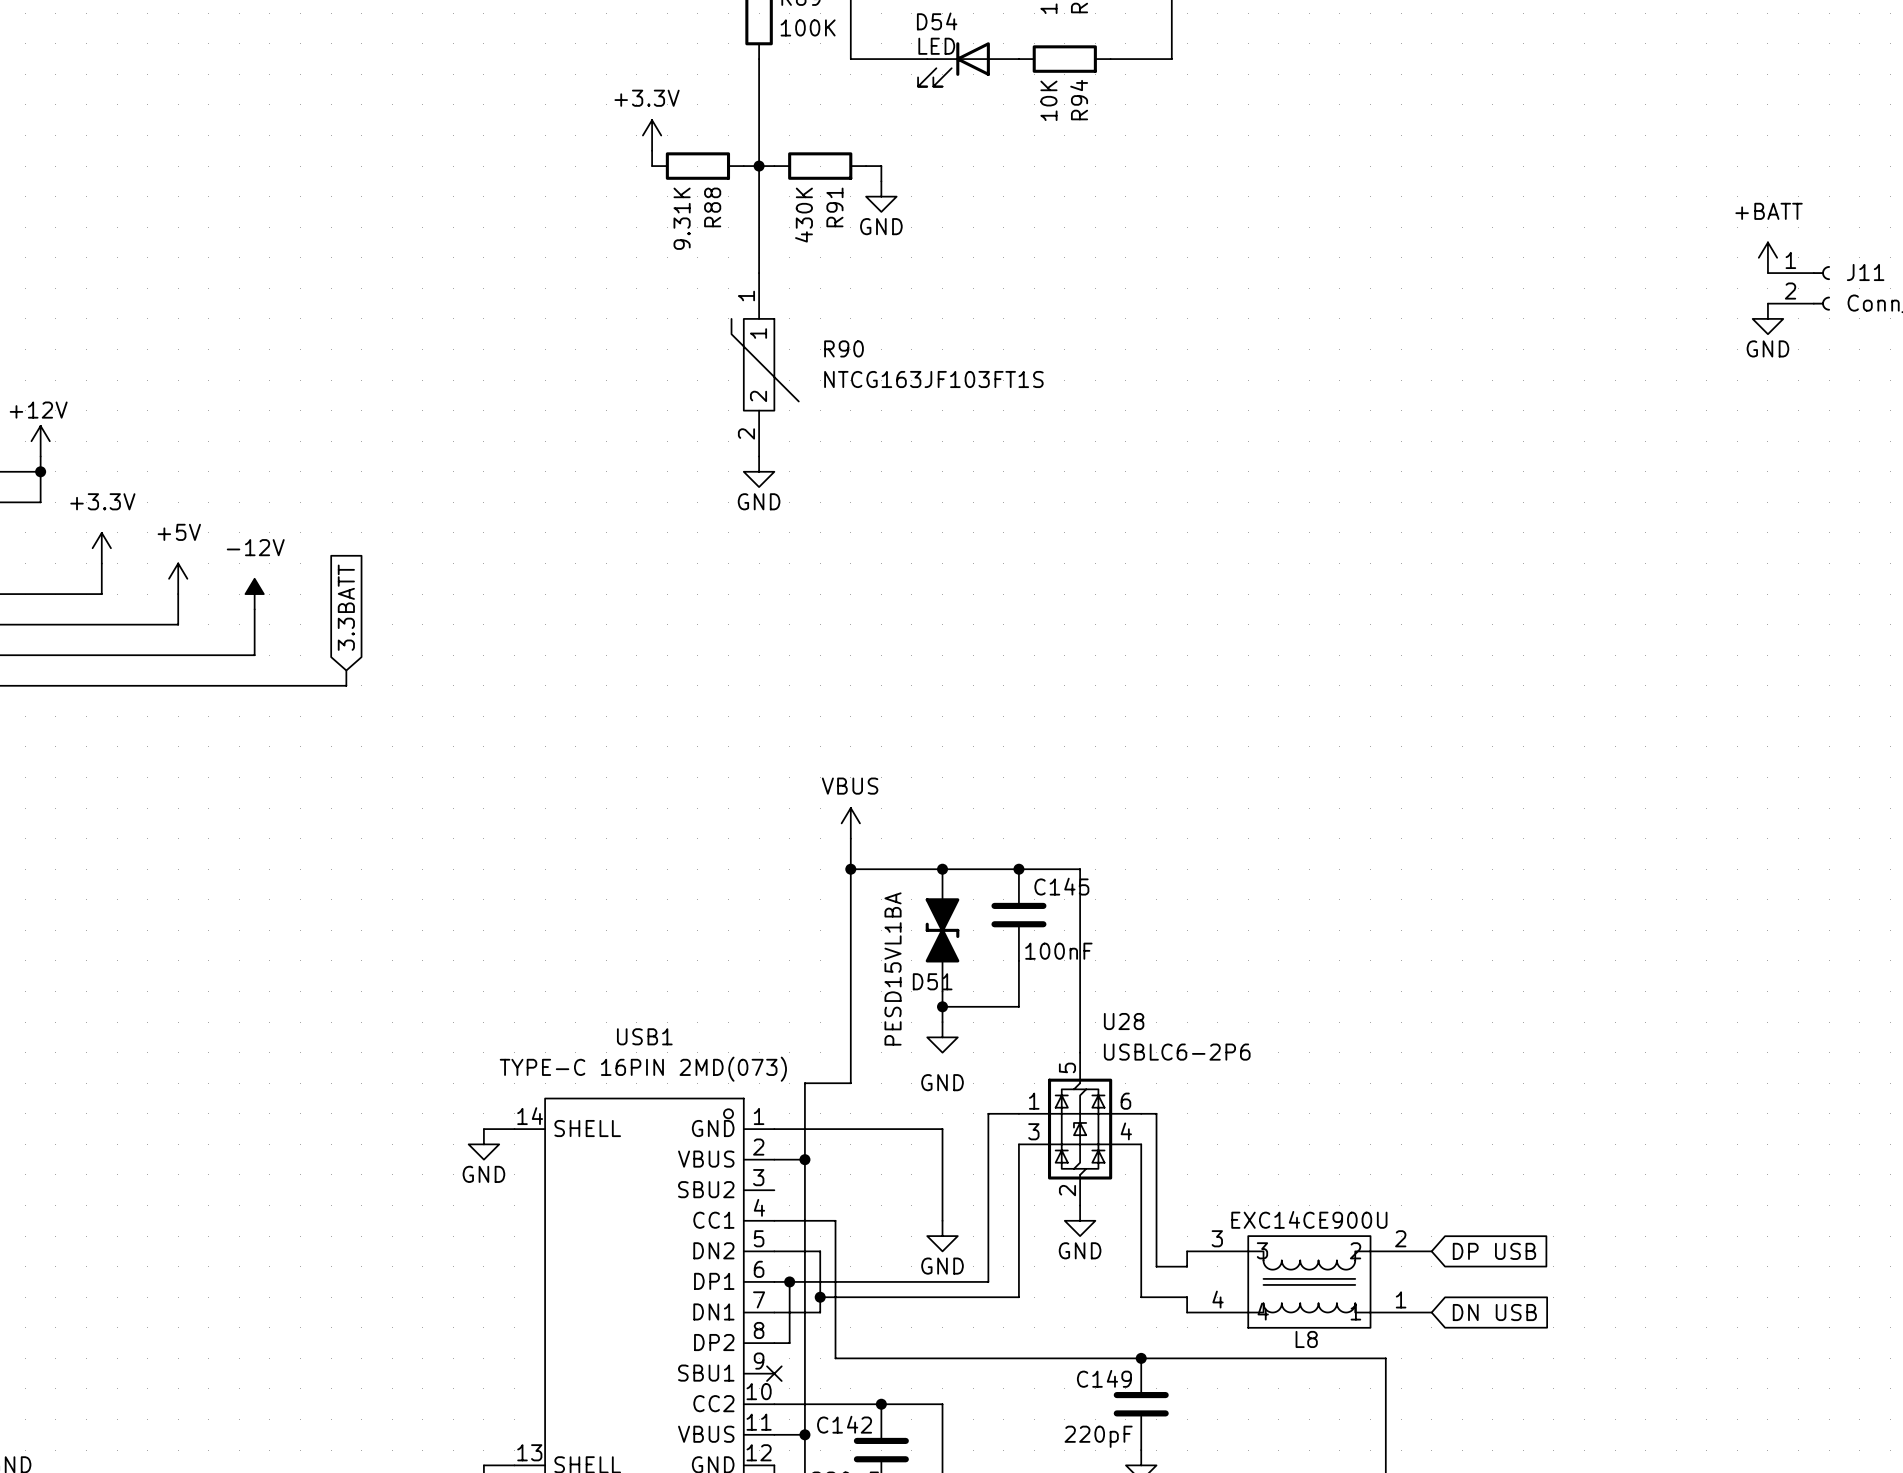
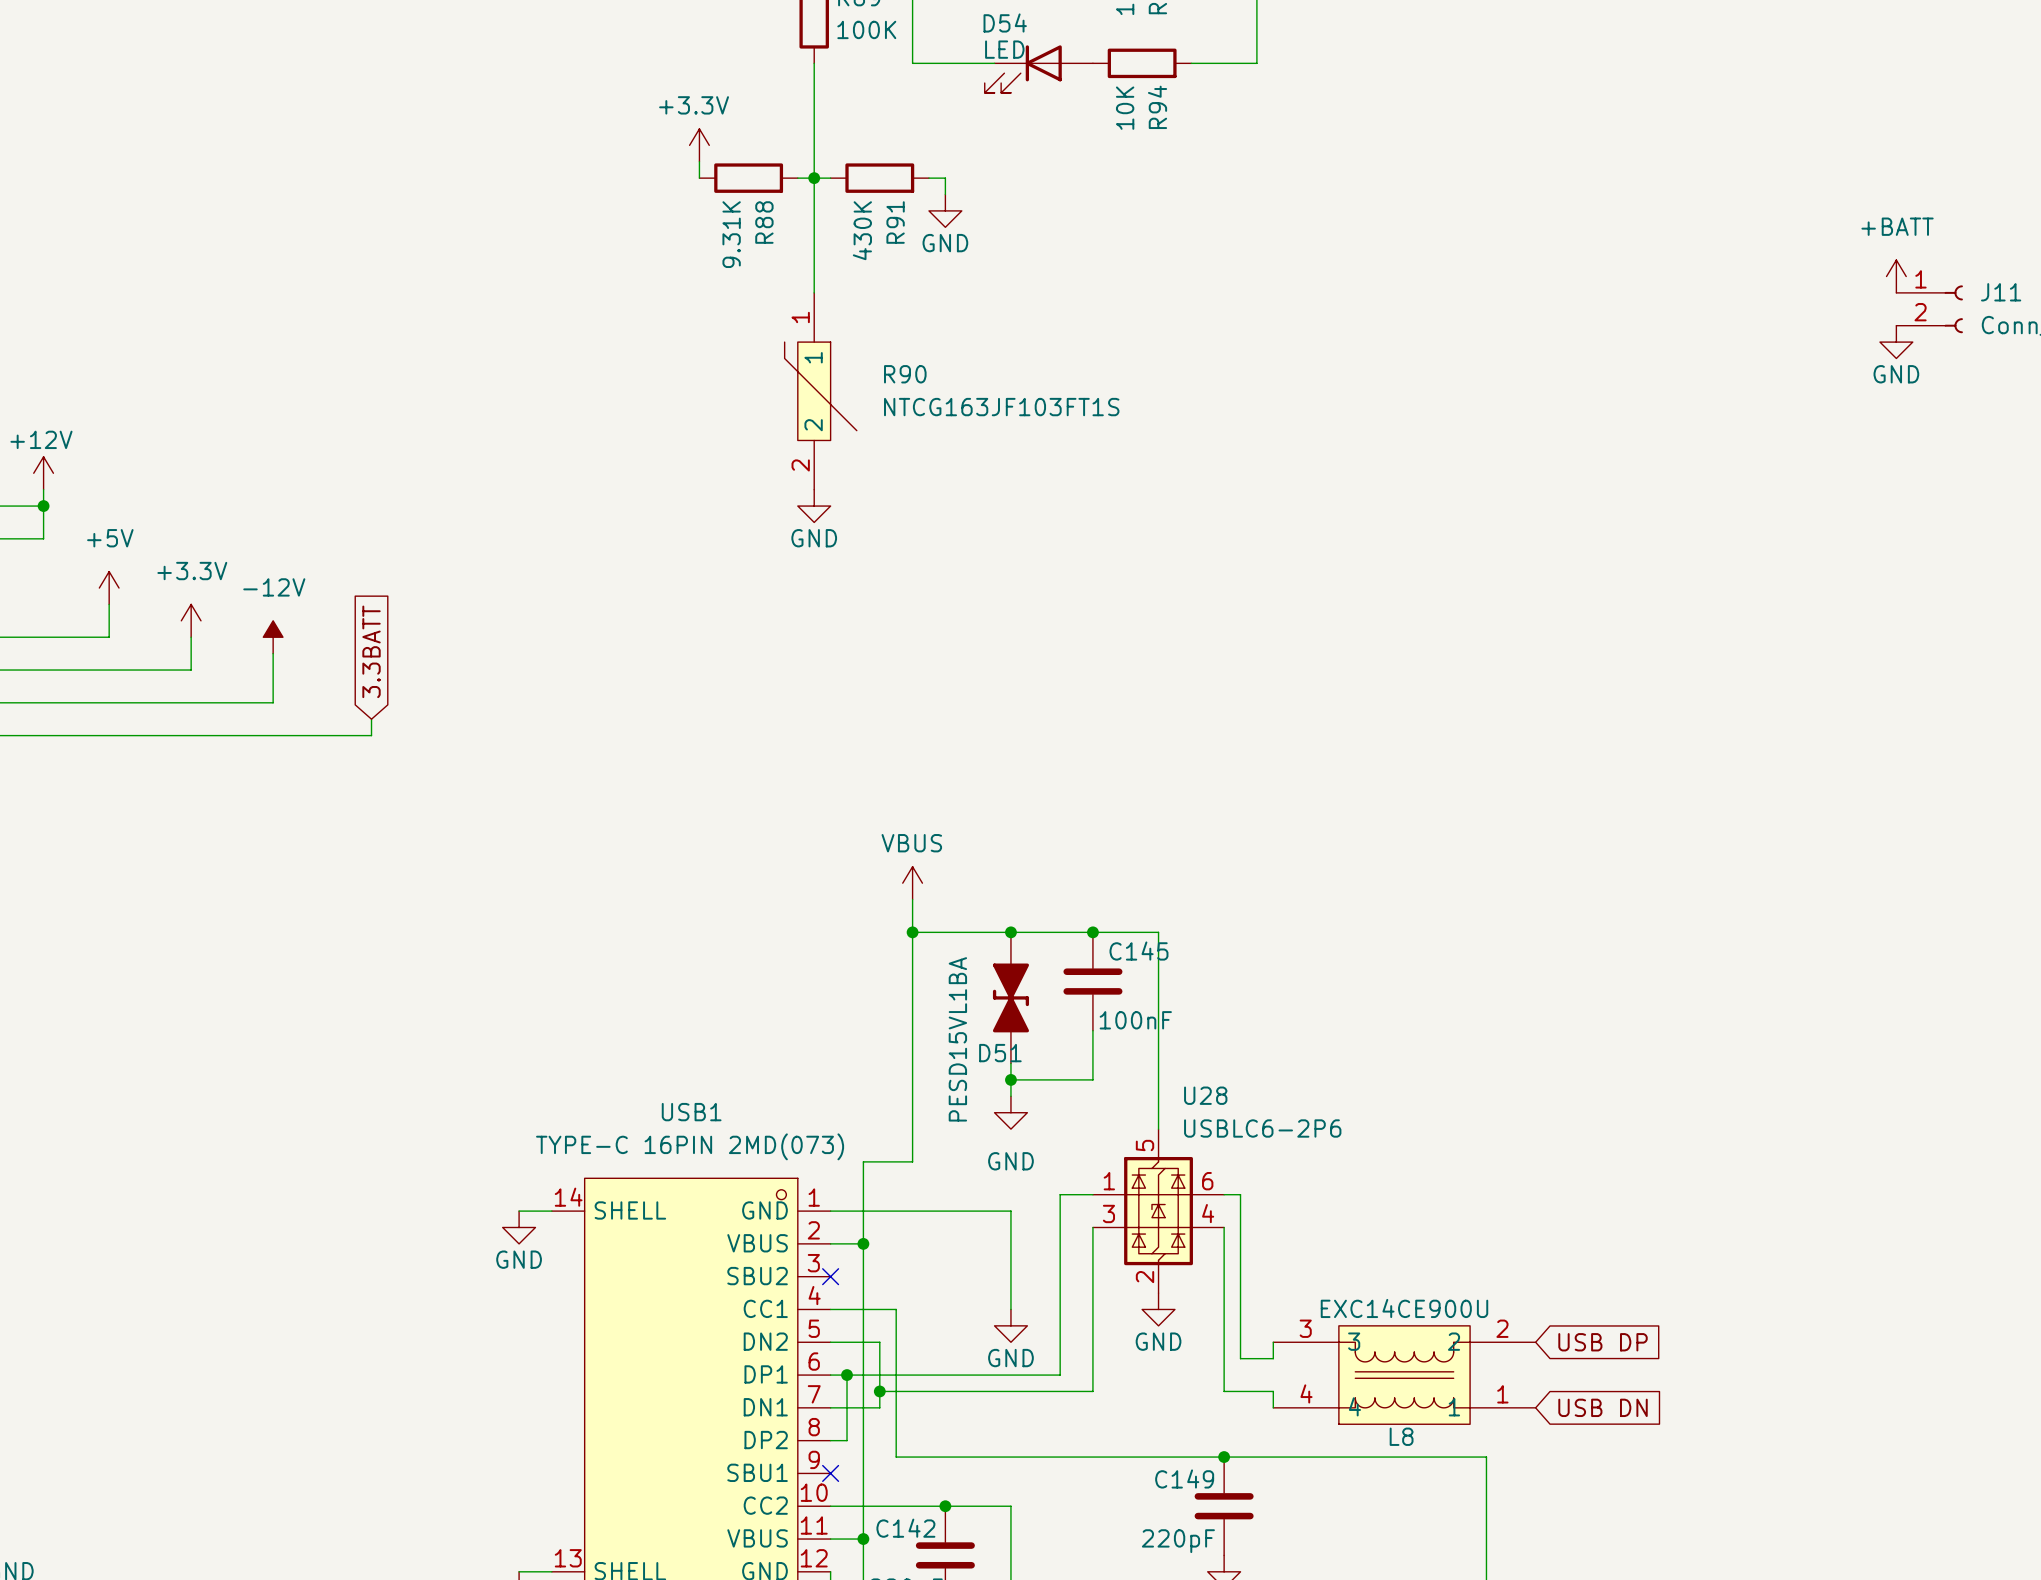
power symbol: +3.3V (101, 548) -> +5V (109, 588)
power symbol: +5V (178, 578) -> +3.3V (191, 620)
no-connect mark: none -> (830, 1276)
global label: DP USB (1494, 1251) -> USB DP (1603, 1342)
global label: DN USB (1494, 1312) -> USB DN (1603, 1407)

